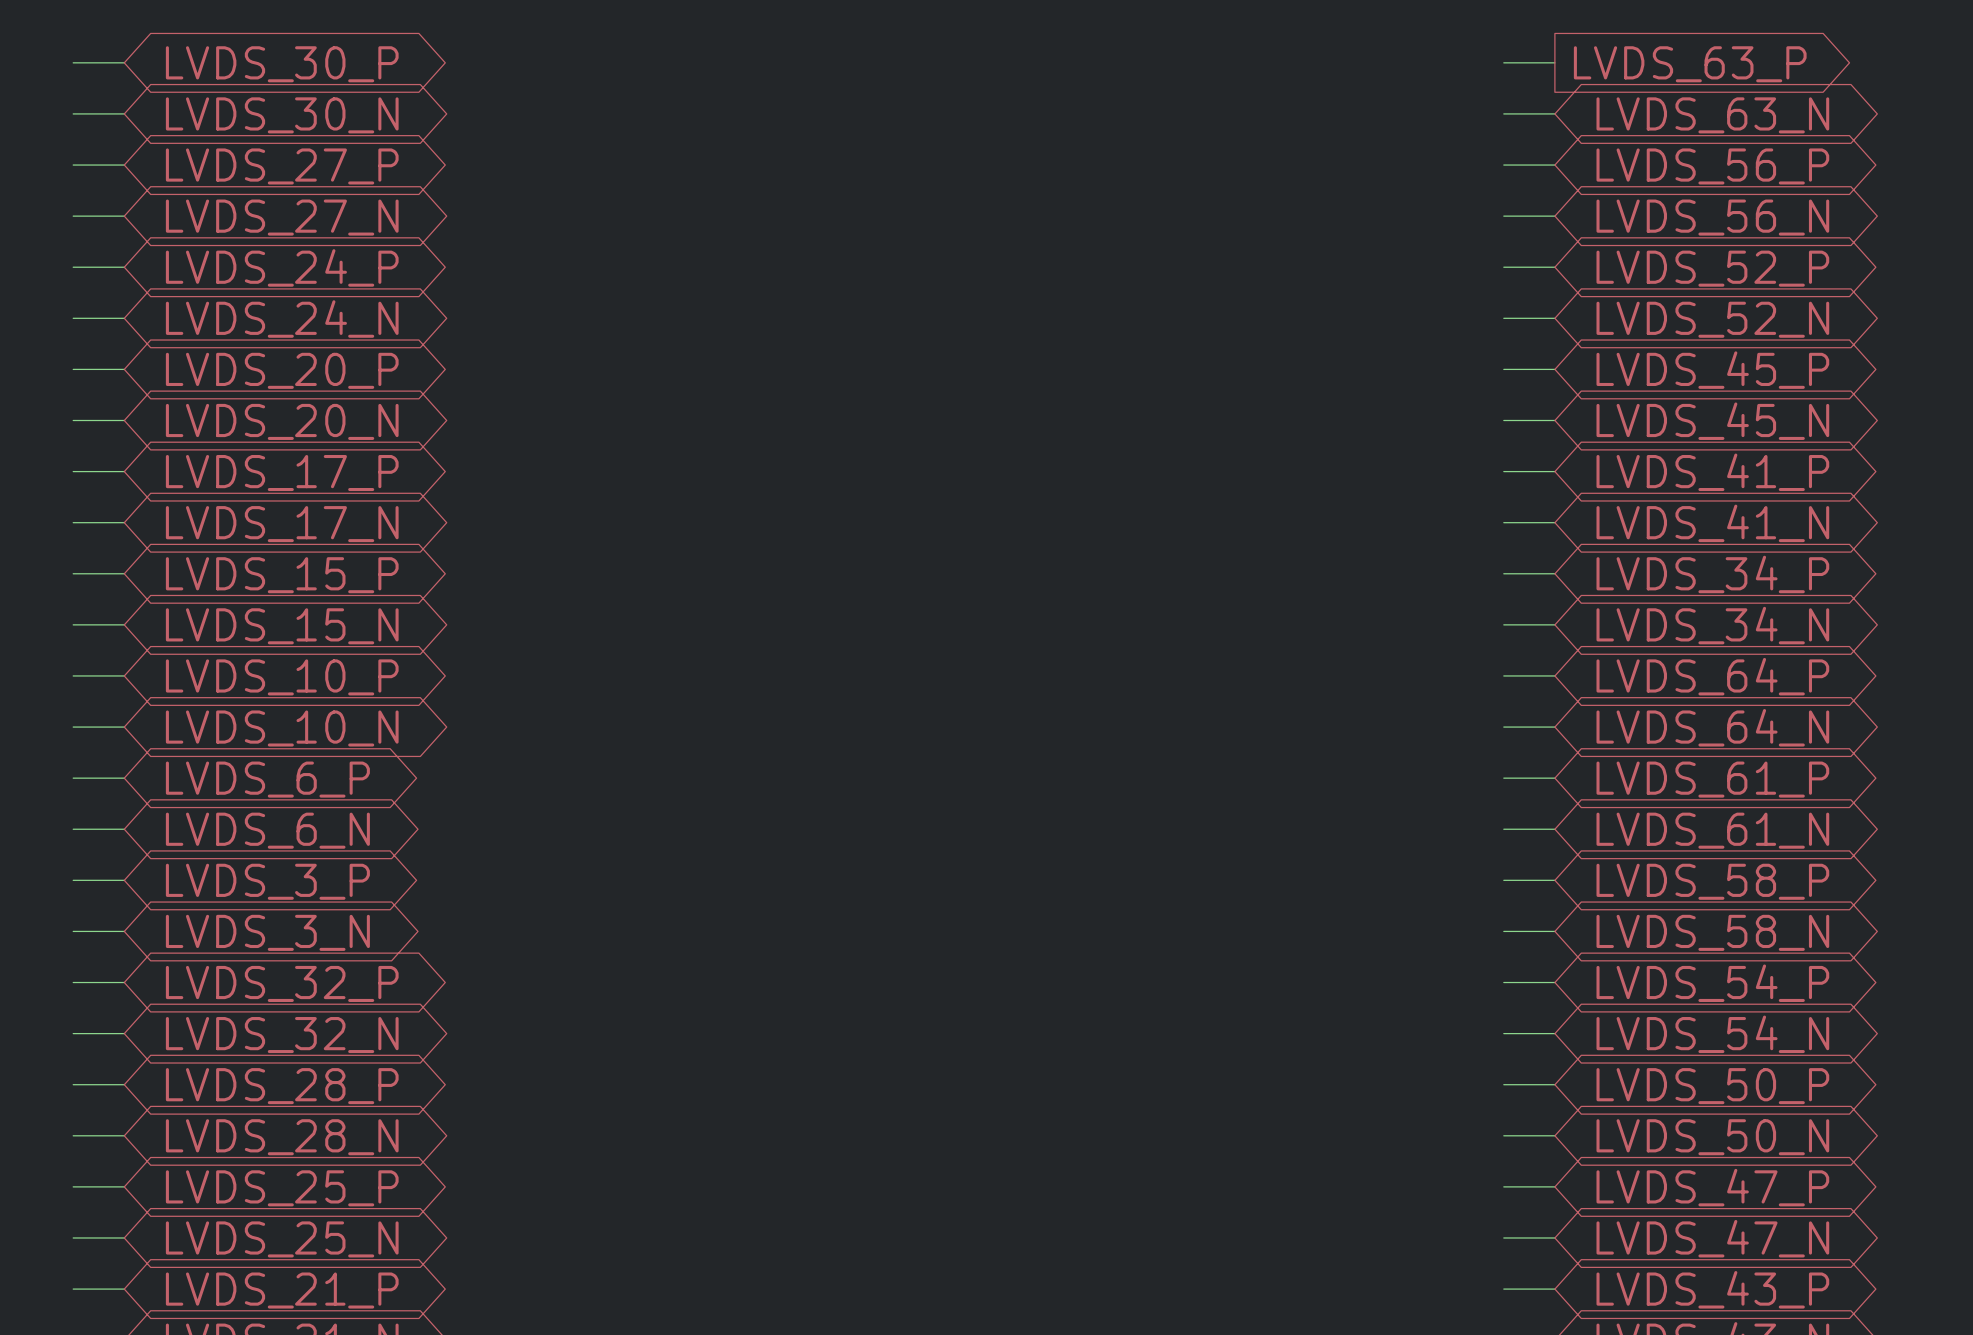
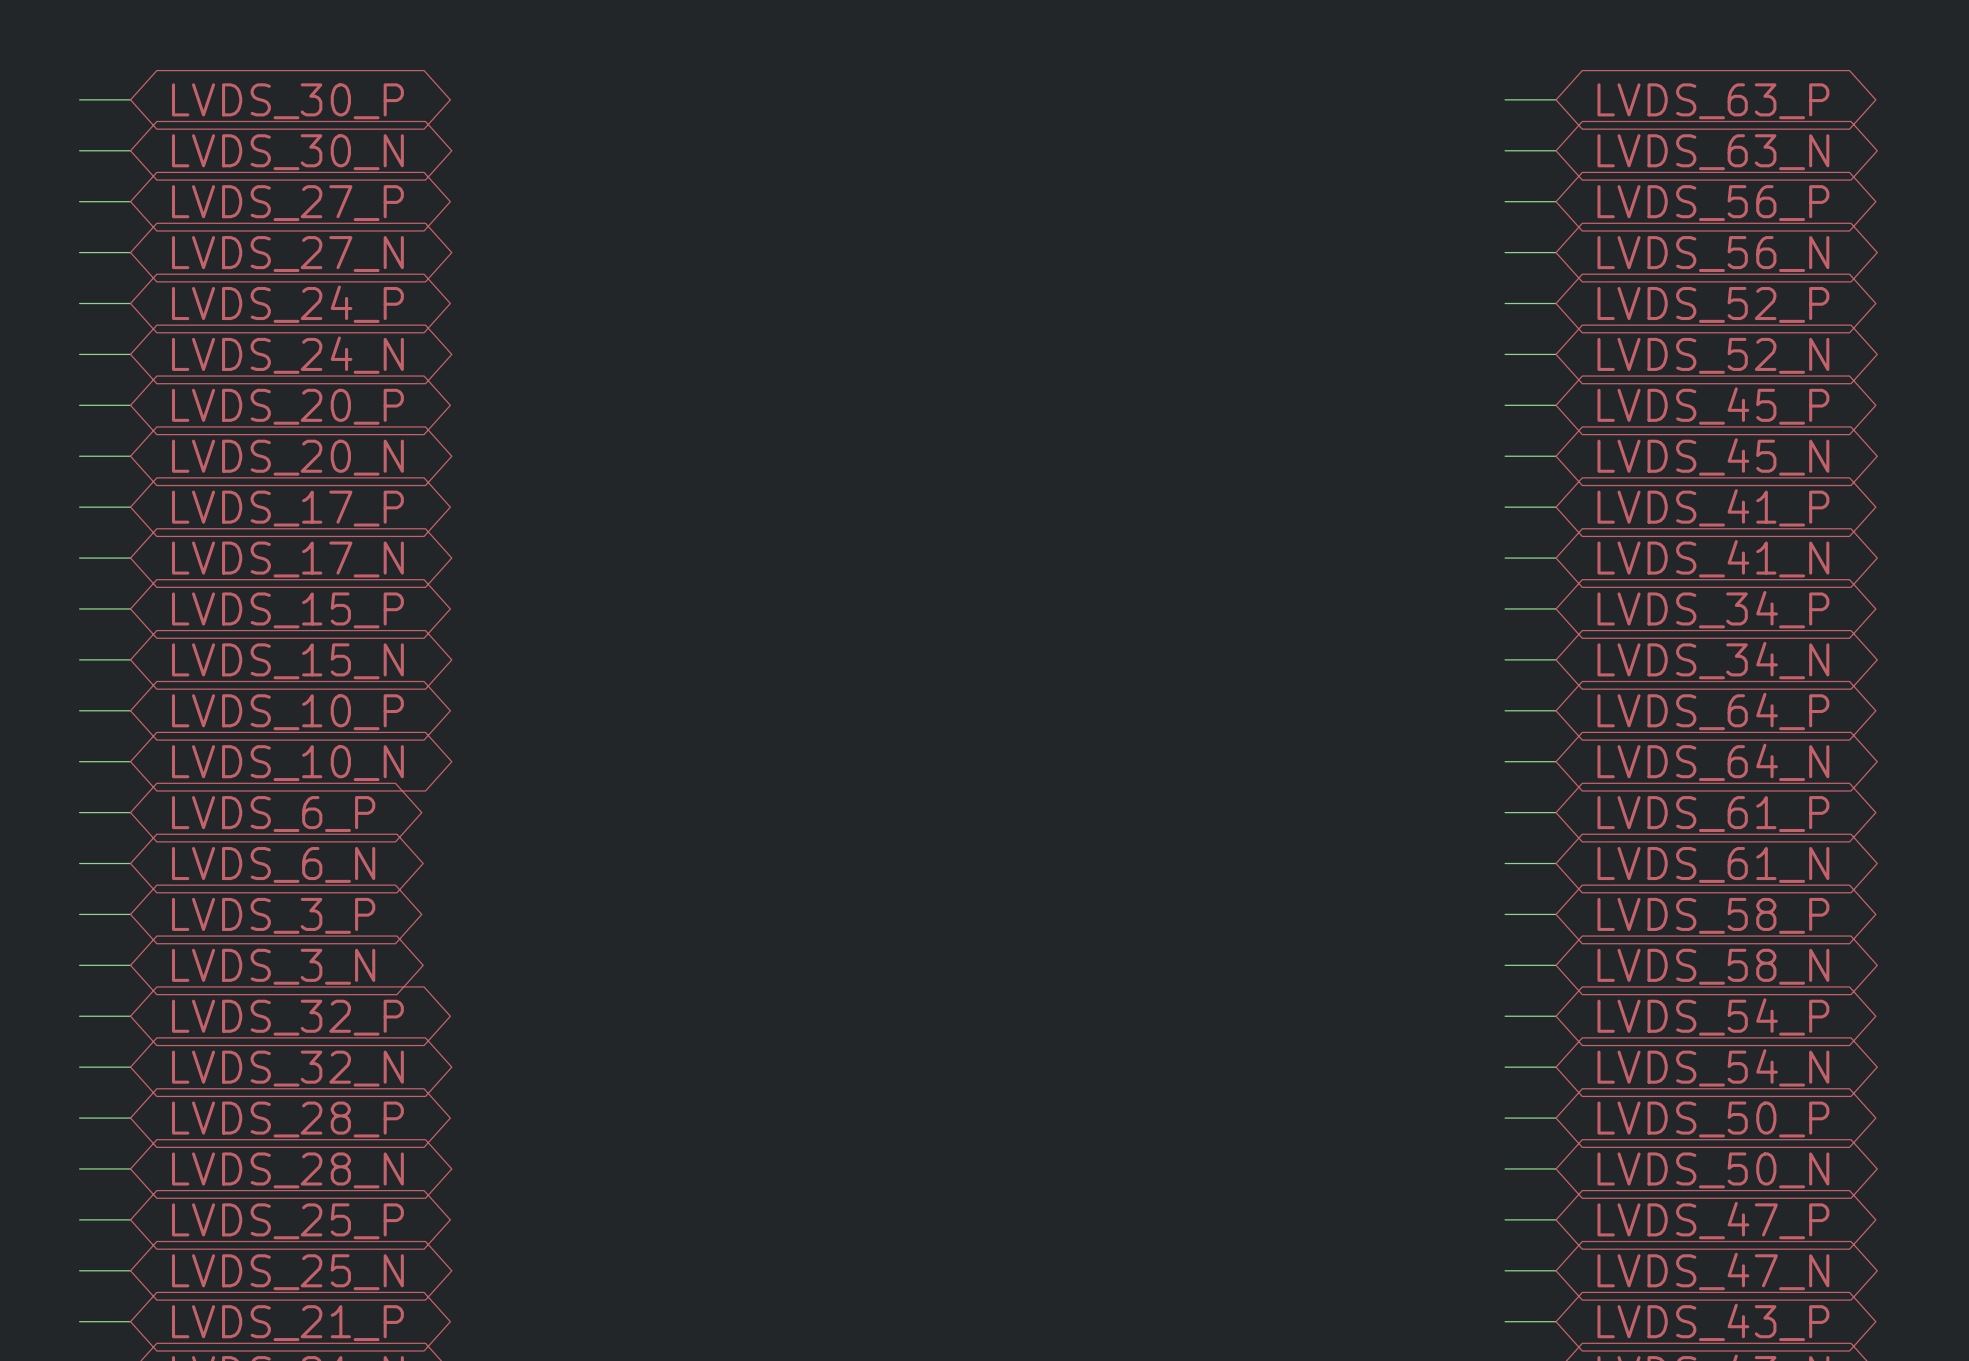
global label shape: output (1690, 64) -> bidirectional (1713, 101)

